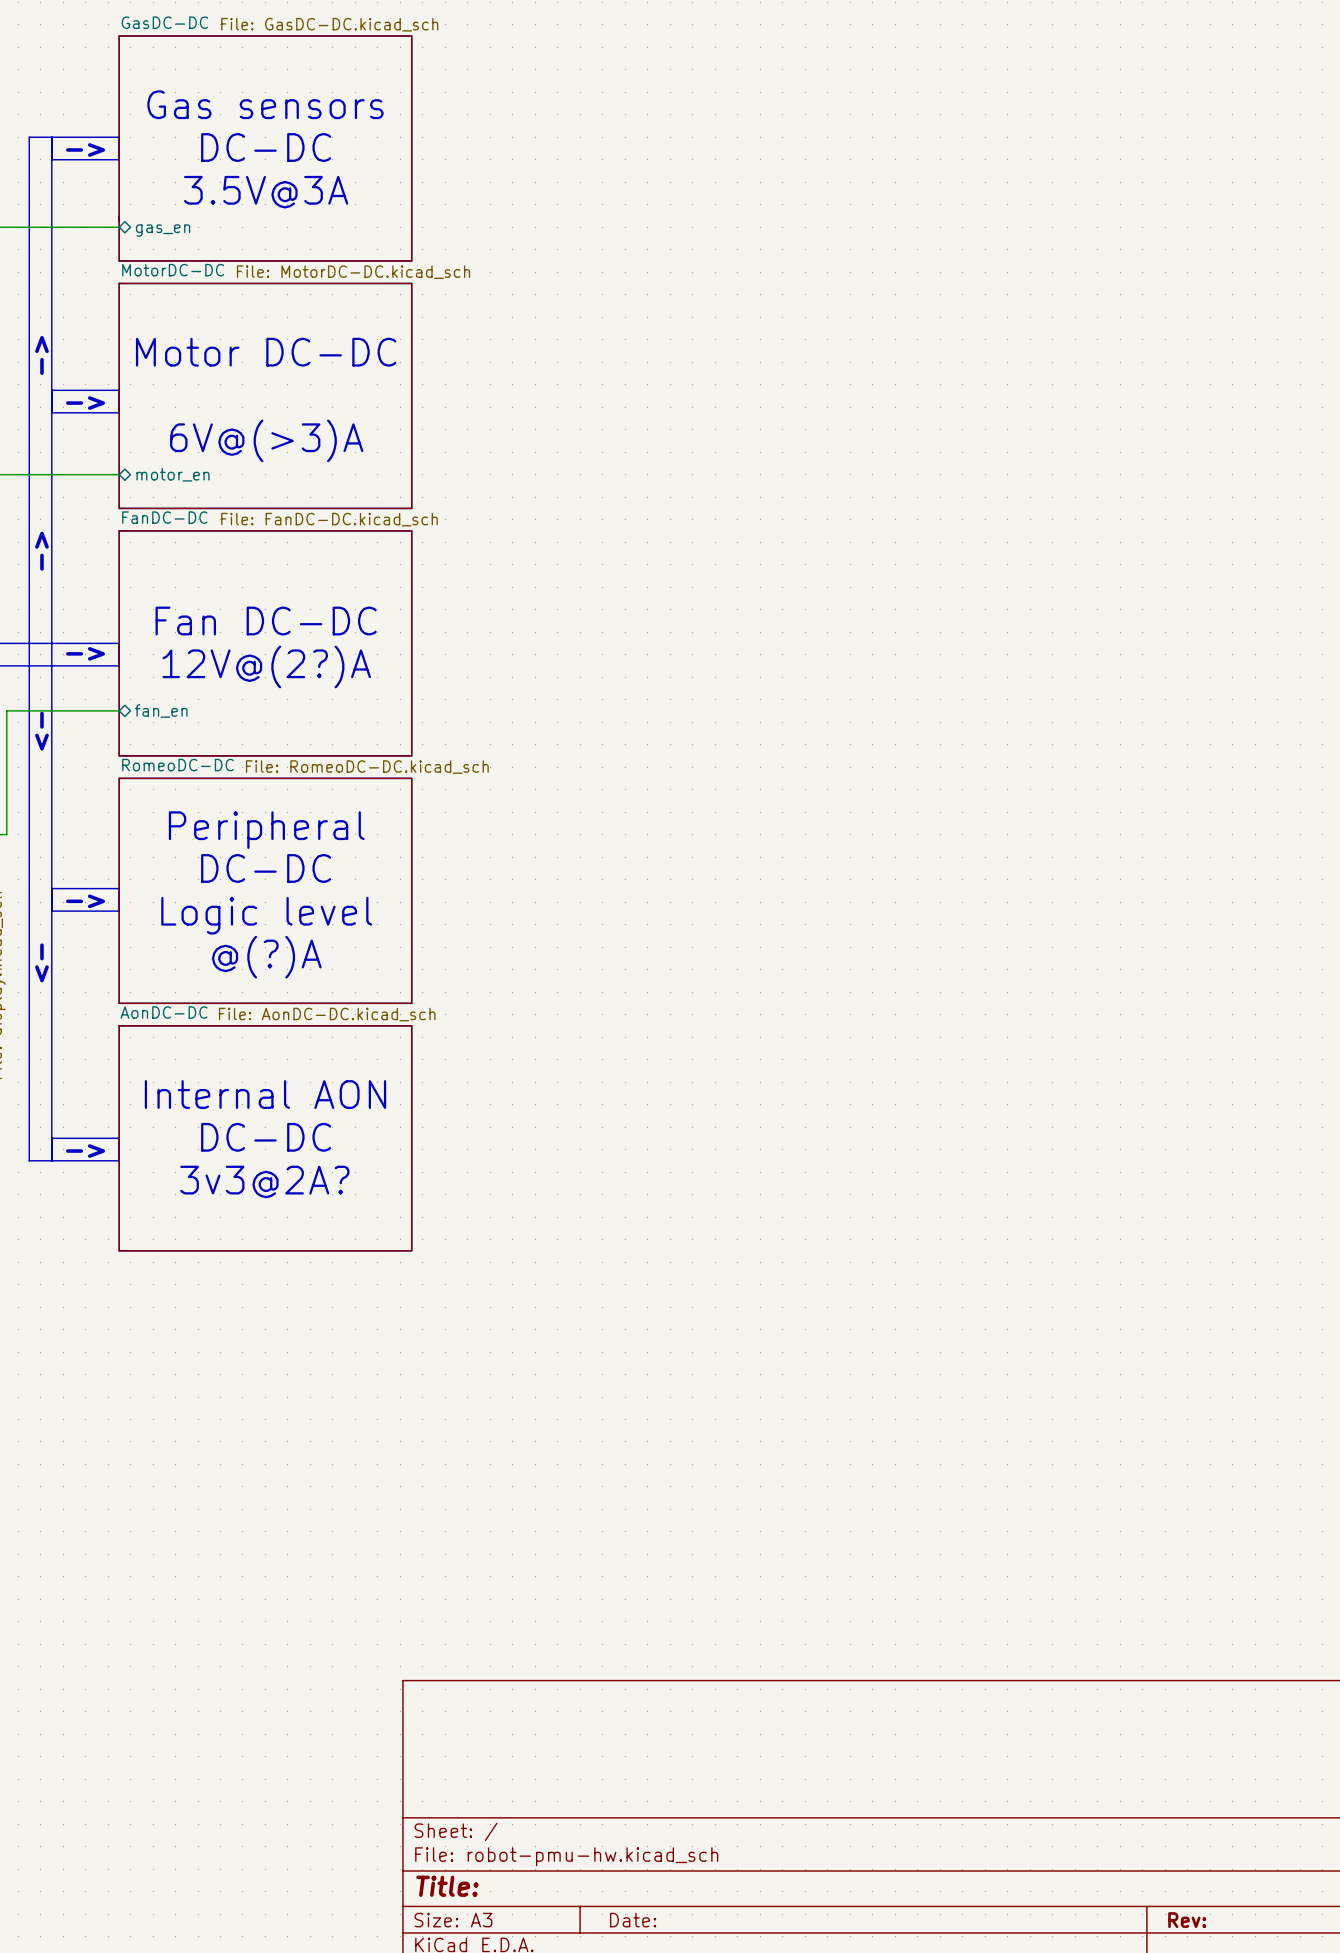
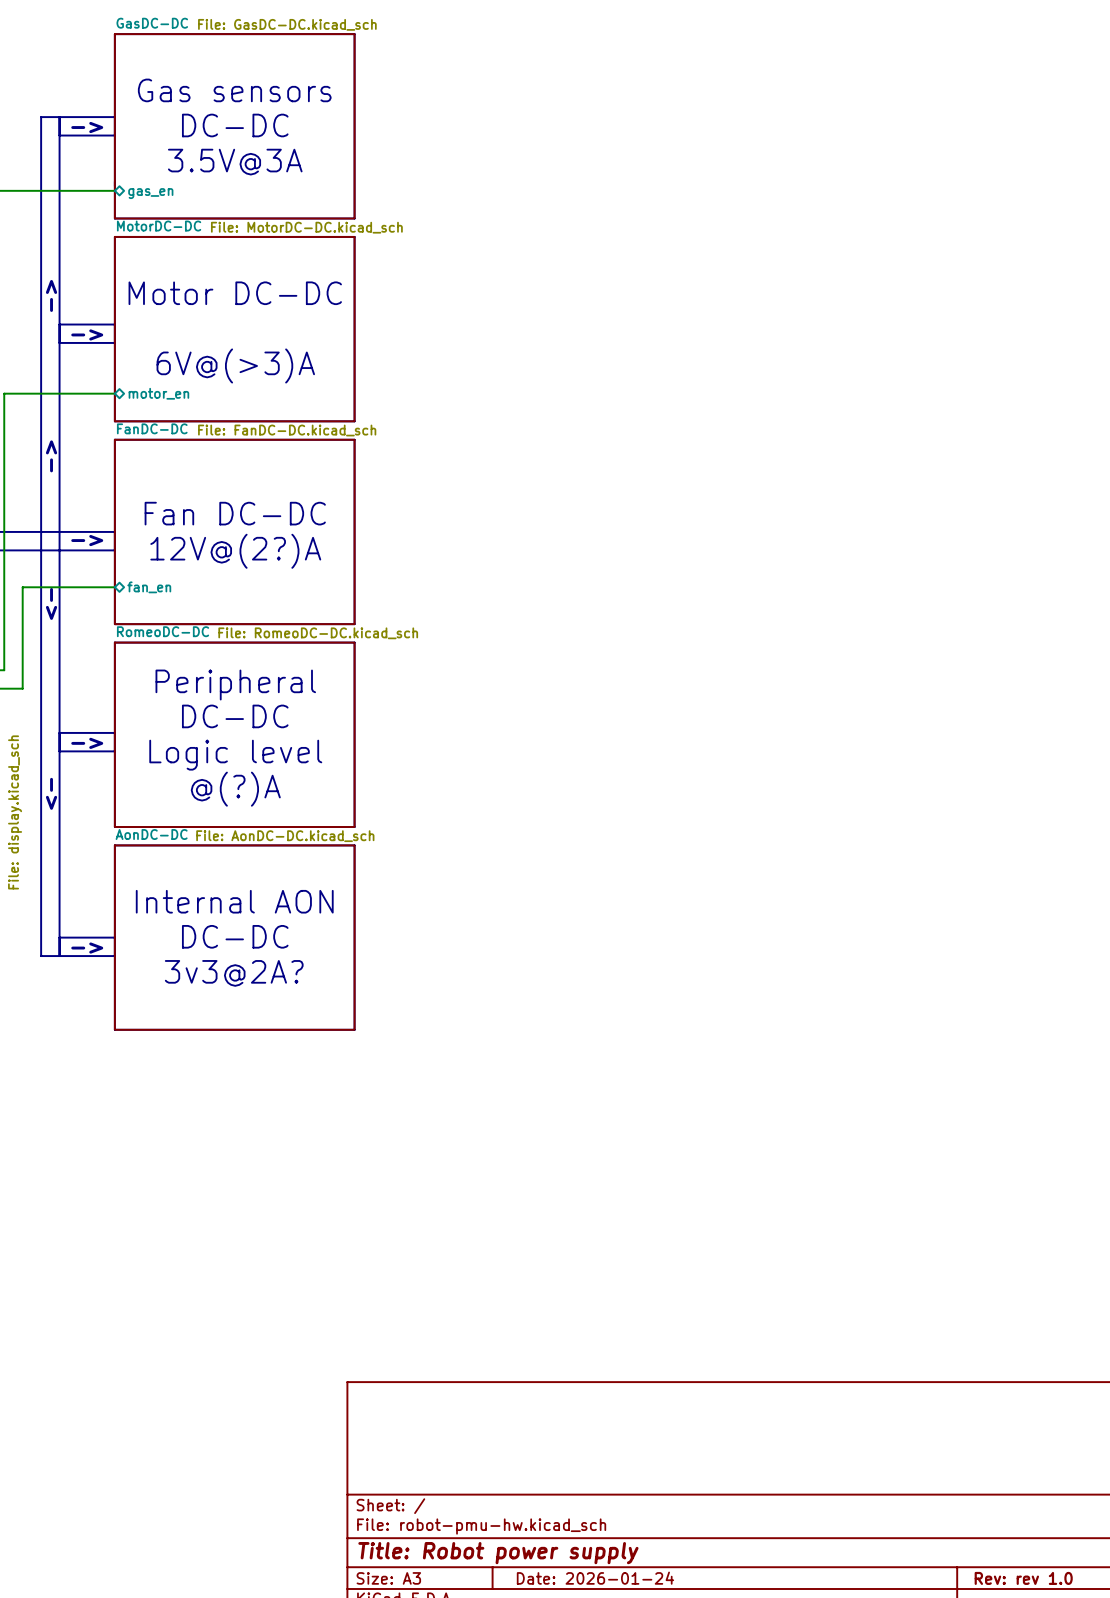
title block: Title: (447, 1886) -> Title: Robot power supply (498, 1553)
title block: Date: (633, 1920) -> Date: 2026-01-24 (595, 1578)
title block: Rev: (1187, 1920) -> Rev: rev 1.0 (1023, 1578)

